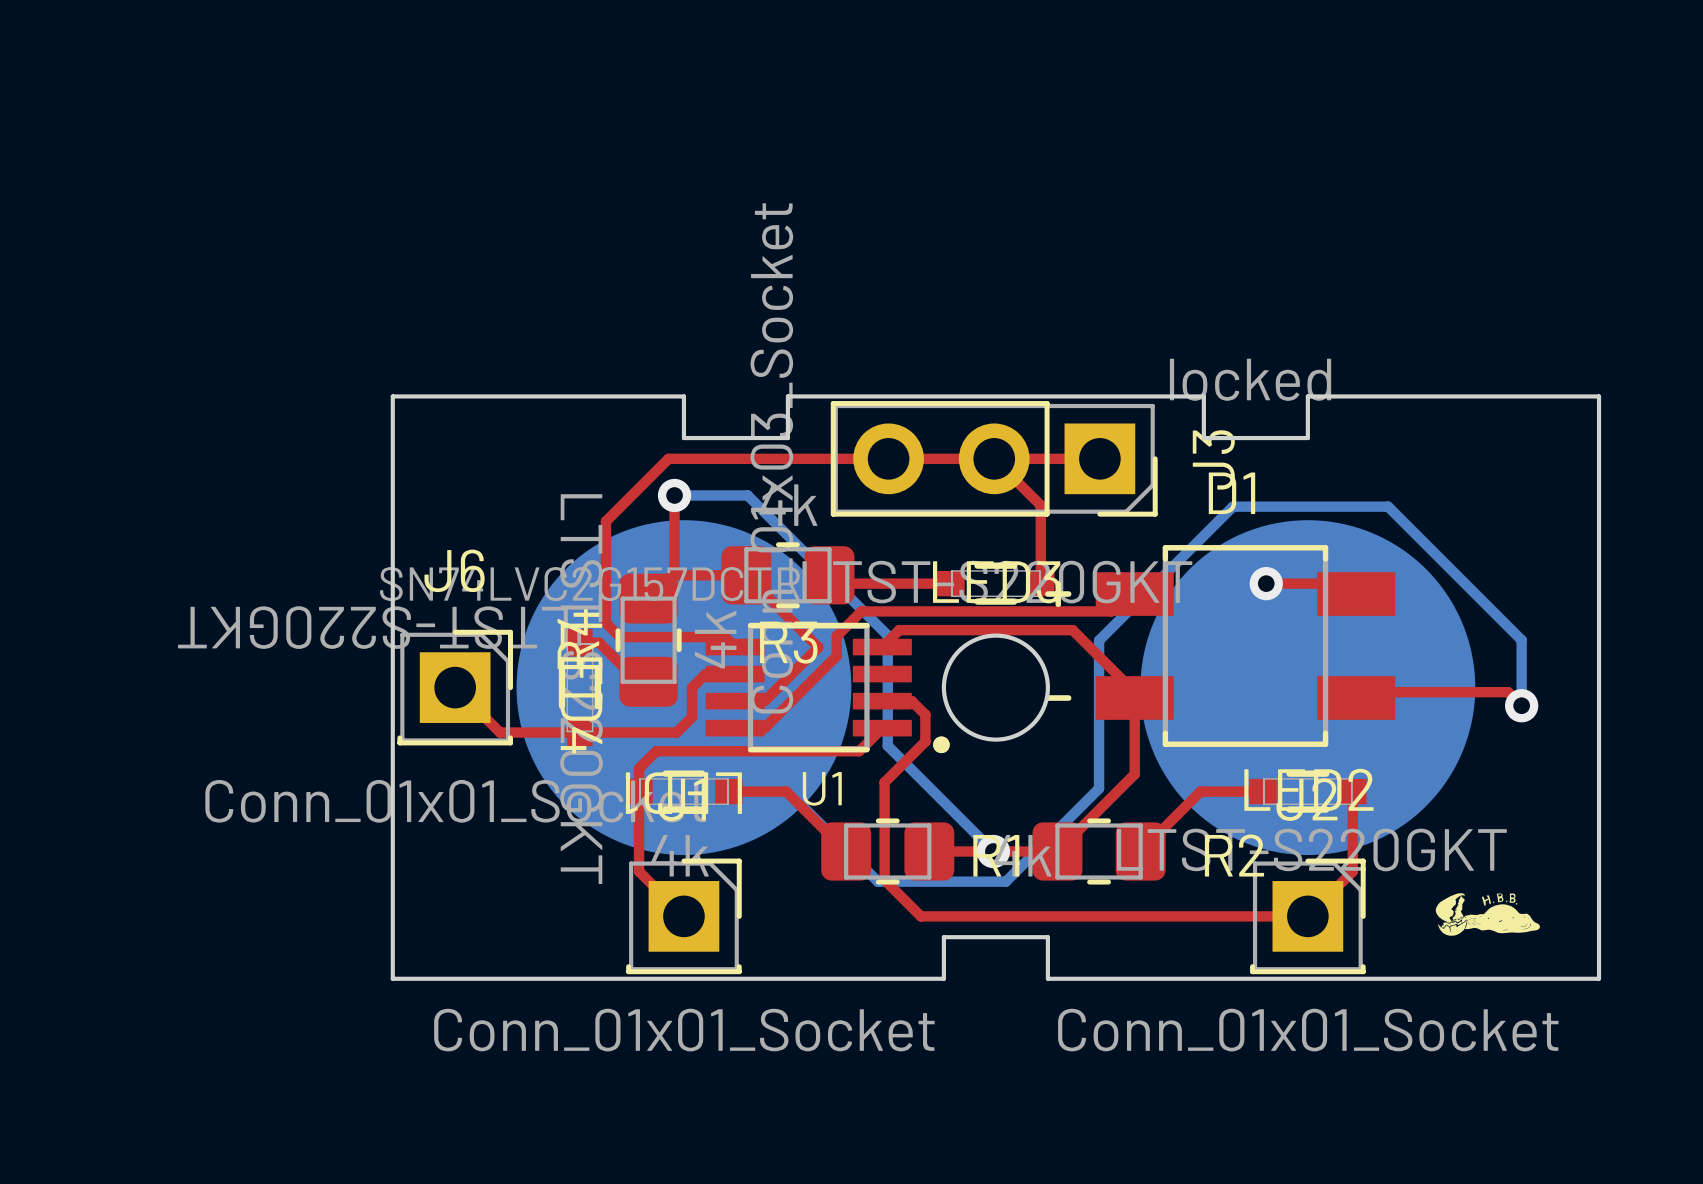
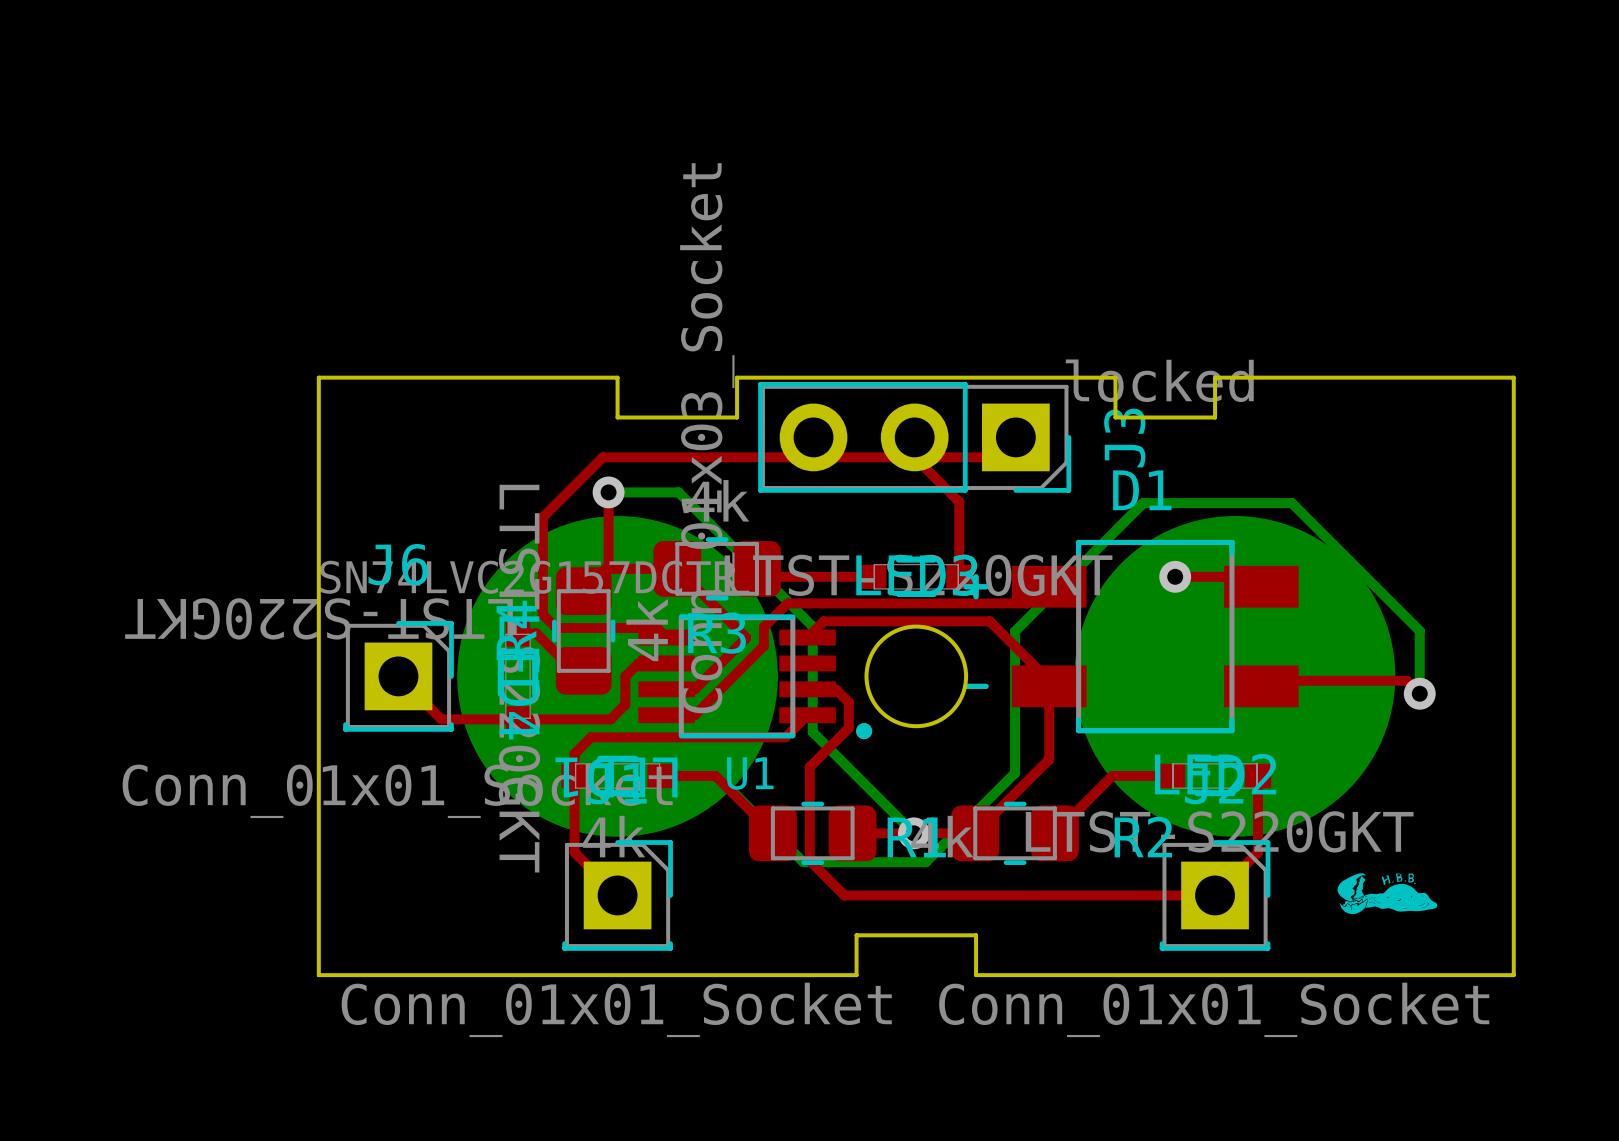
board edge: (683, 396) (392, 396) (392, 978) (943, 978) (943, 937) (1047, 937) (1047, 978) (1599, 978) (1599, 396) (1307, 396) -> (617, 397) (617, 377) (318, 377) (318, 975) (856, 975) (856, 935) (976, 935) (976, 975) (1513, 975) (1513, 377) (1215, 377) (1215, 397)
board edge: (1203, 396) (787, 396) (787, 438) (683, 438) (683, 417) -> (1115, 397) (1115, 377) (737, 377) (737, 417) (617, 417)
board edge: (1203, 417) (1203, 438) (1307, 438) (1307, 417) -> (1115, 417) (1215, 417)
J3 position: (994, 458) -> (914, 437)
part position: (1307, 687) -> (1234, 676)

